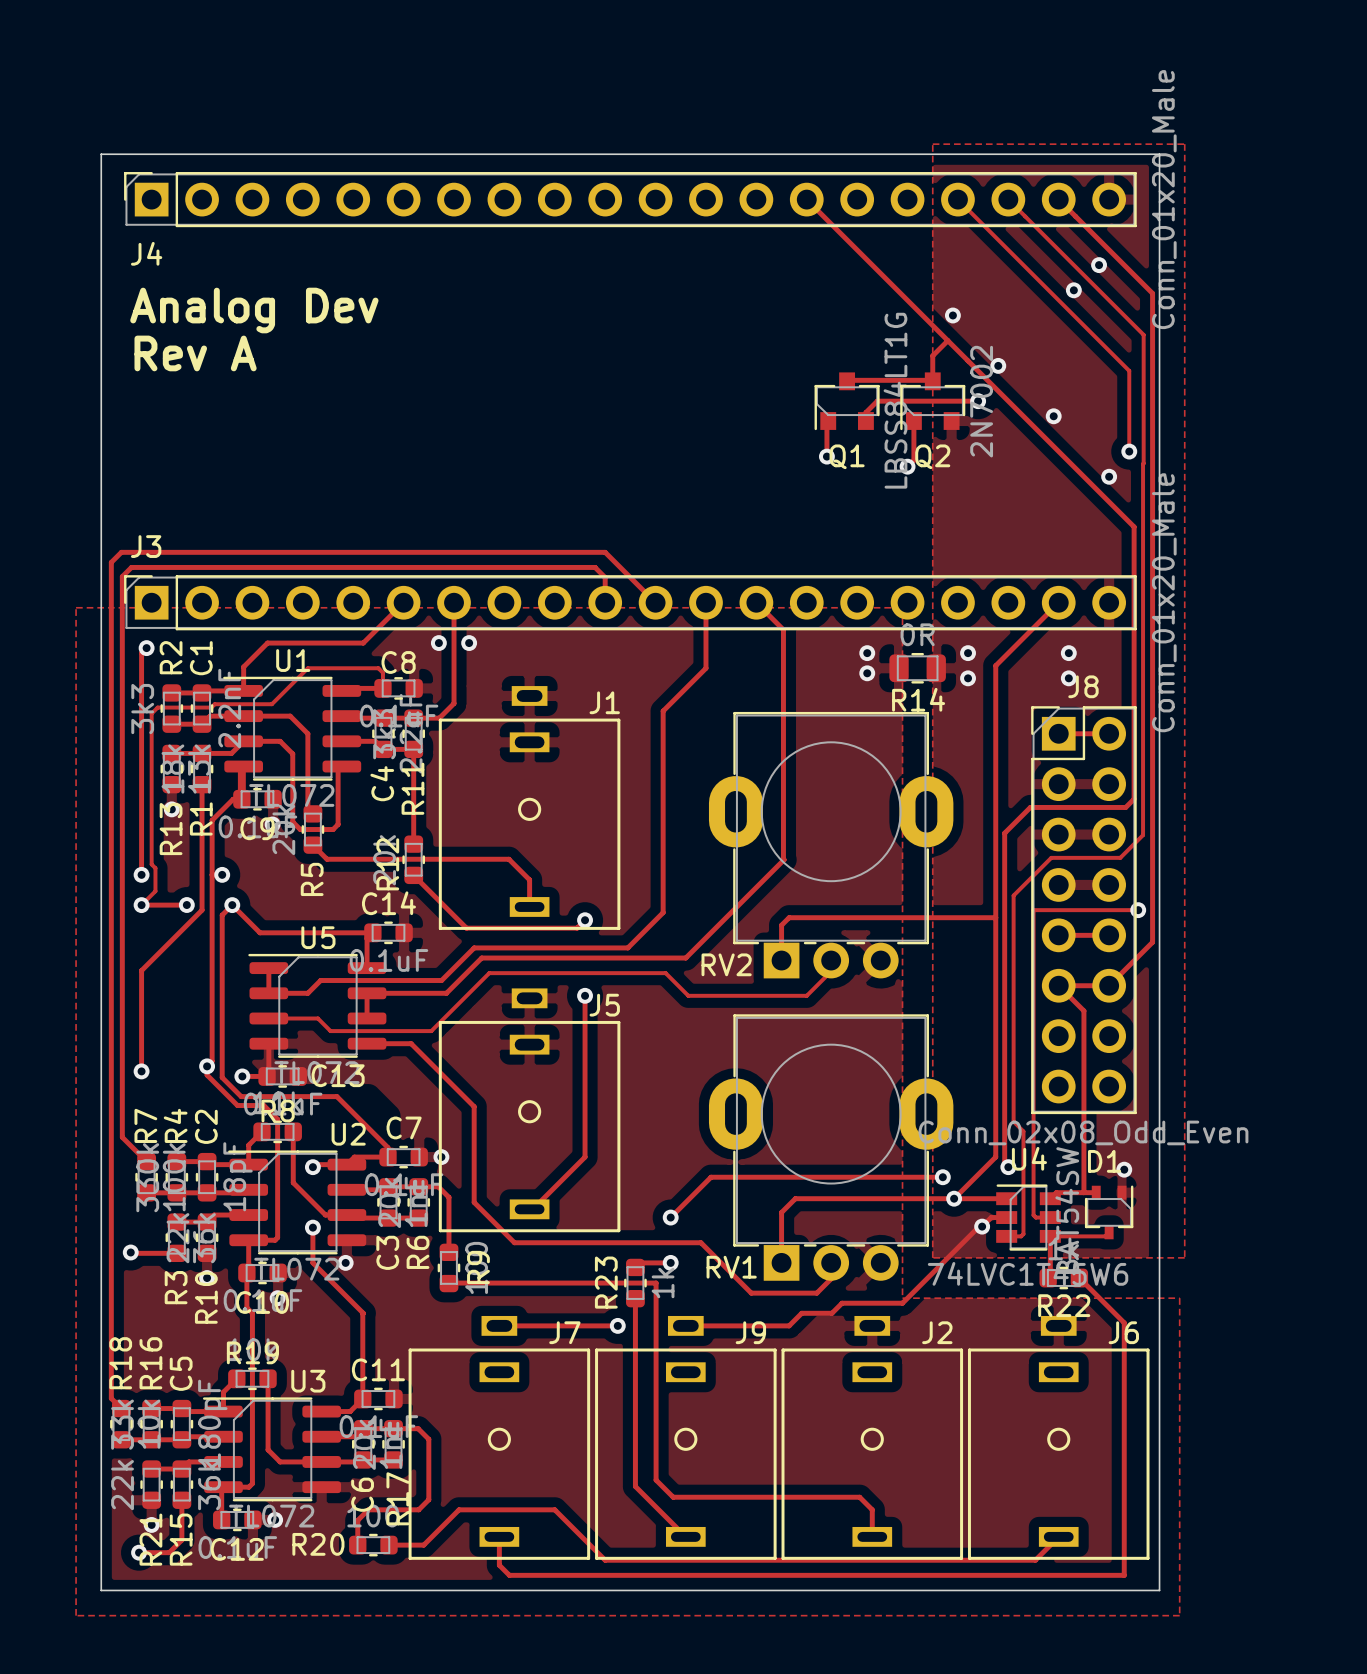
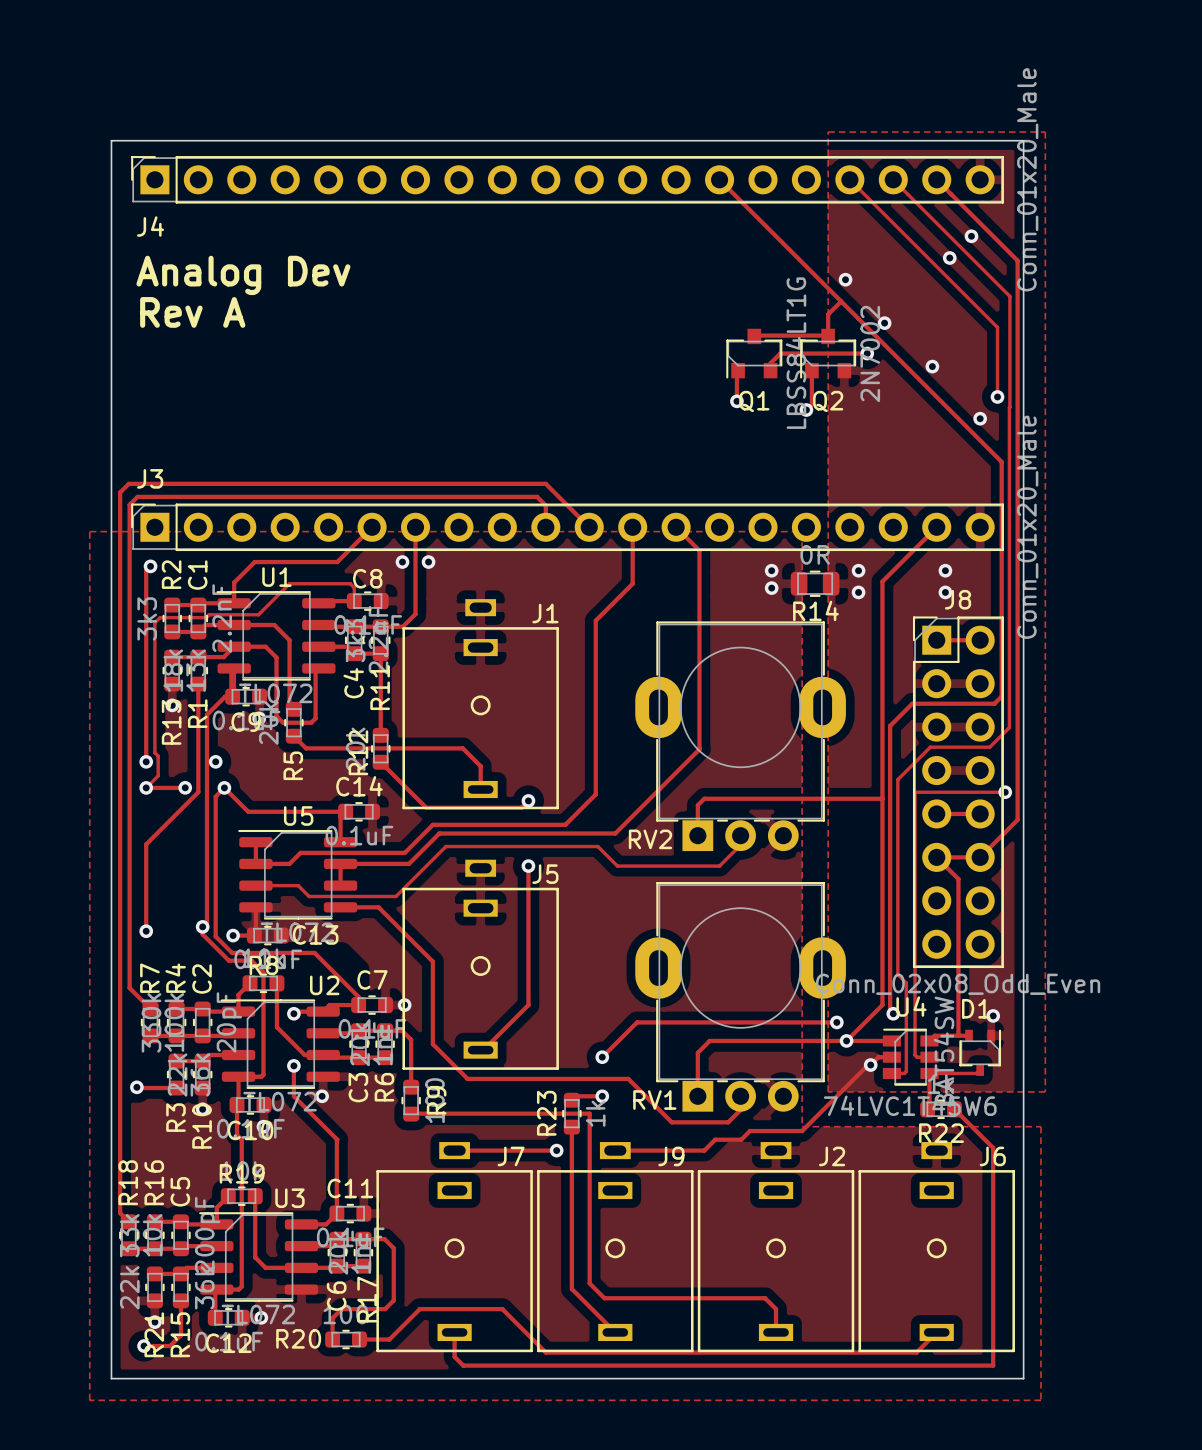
C2 value: 18pF (238, 1176) -> 20pF (229, 1022)
C5 value: 180pF (212, 1423) -> 200pF (207, 1235)

